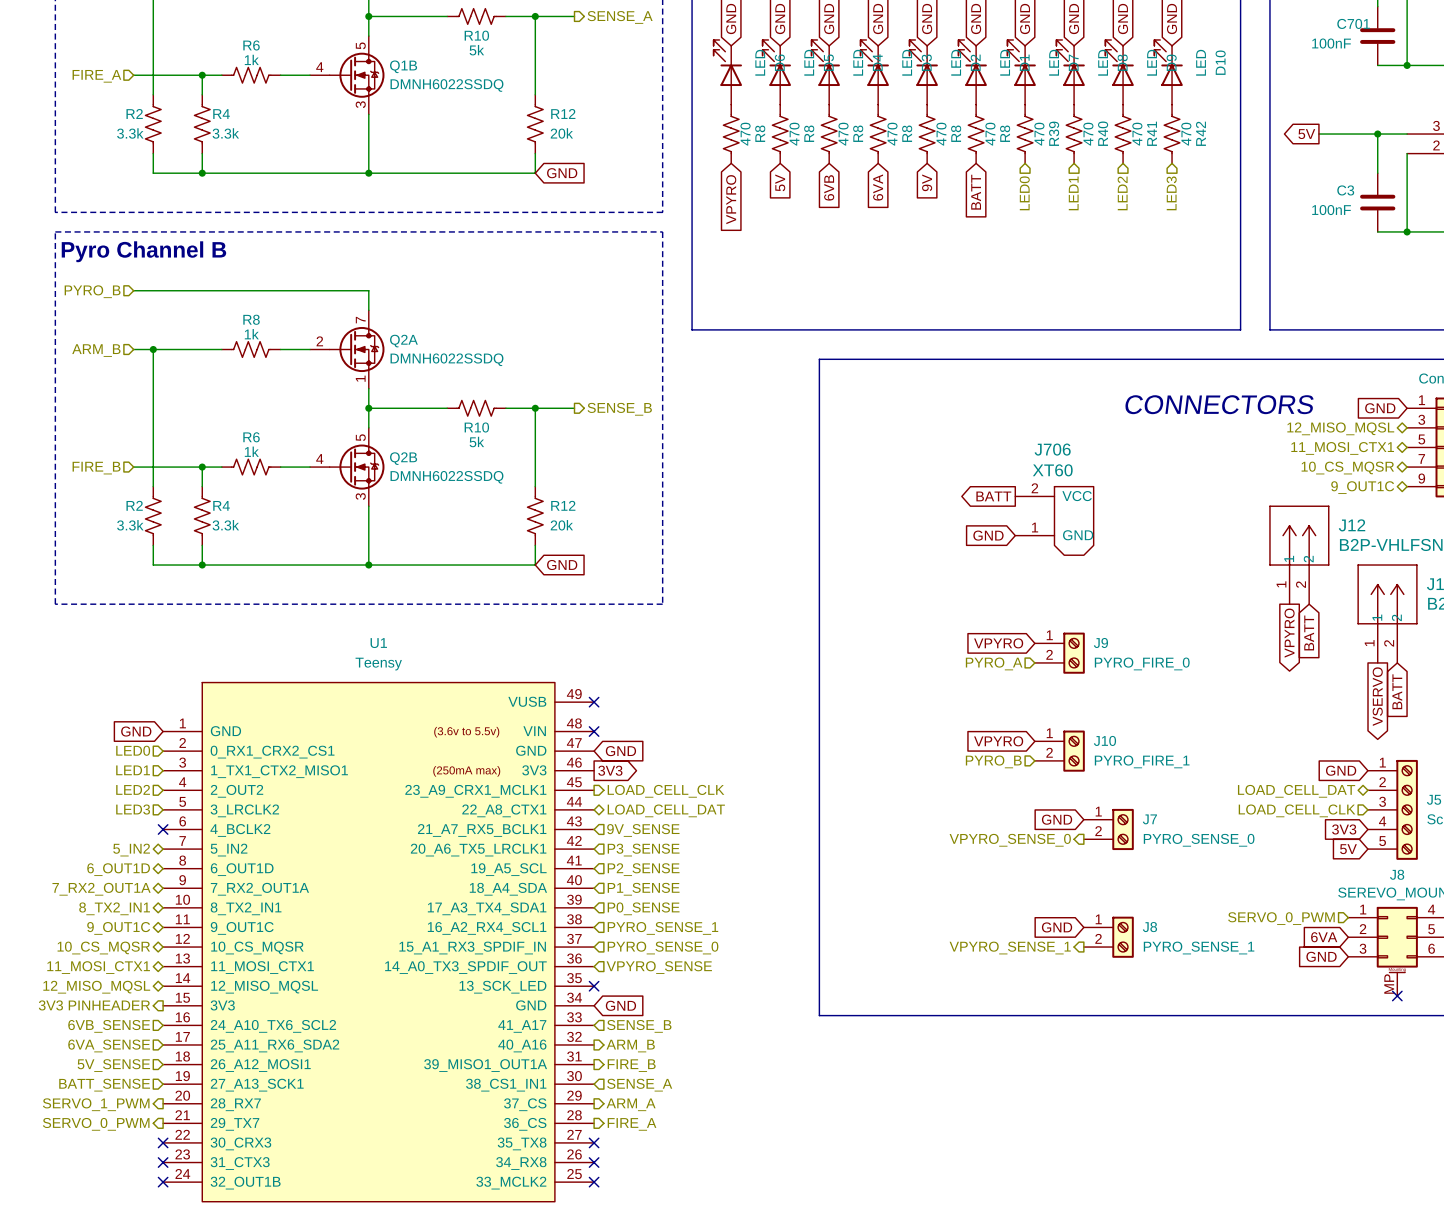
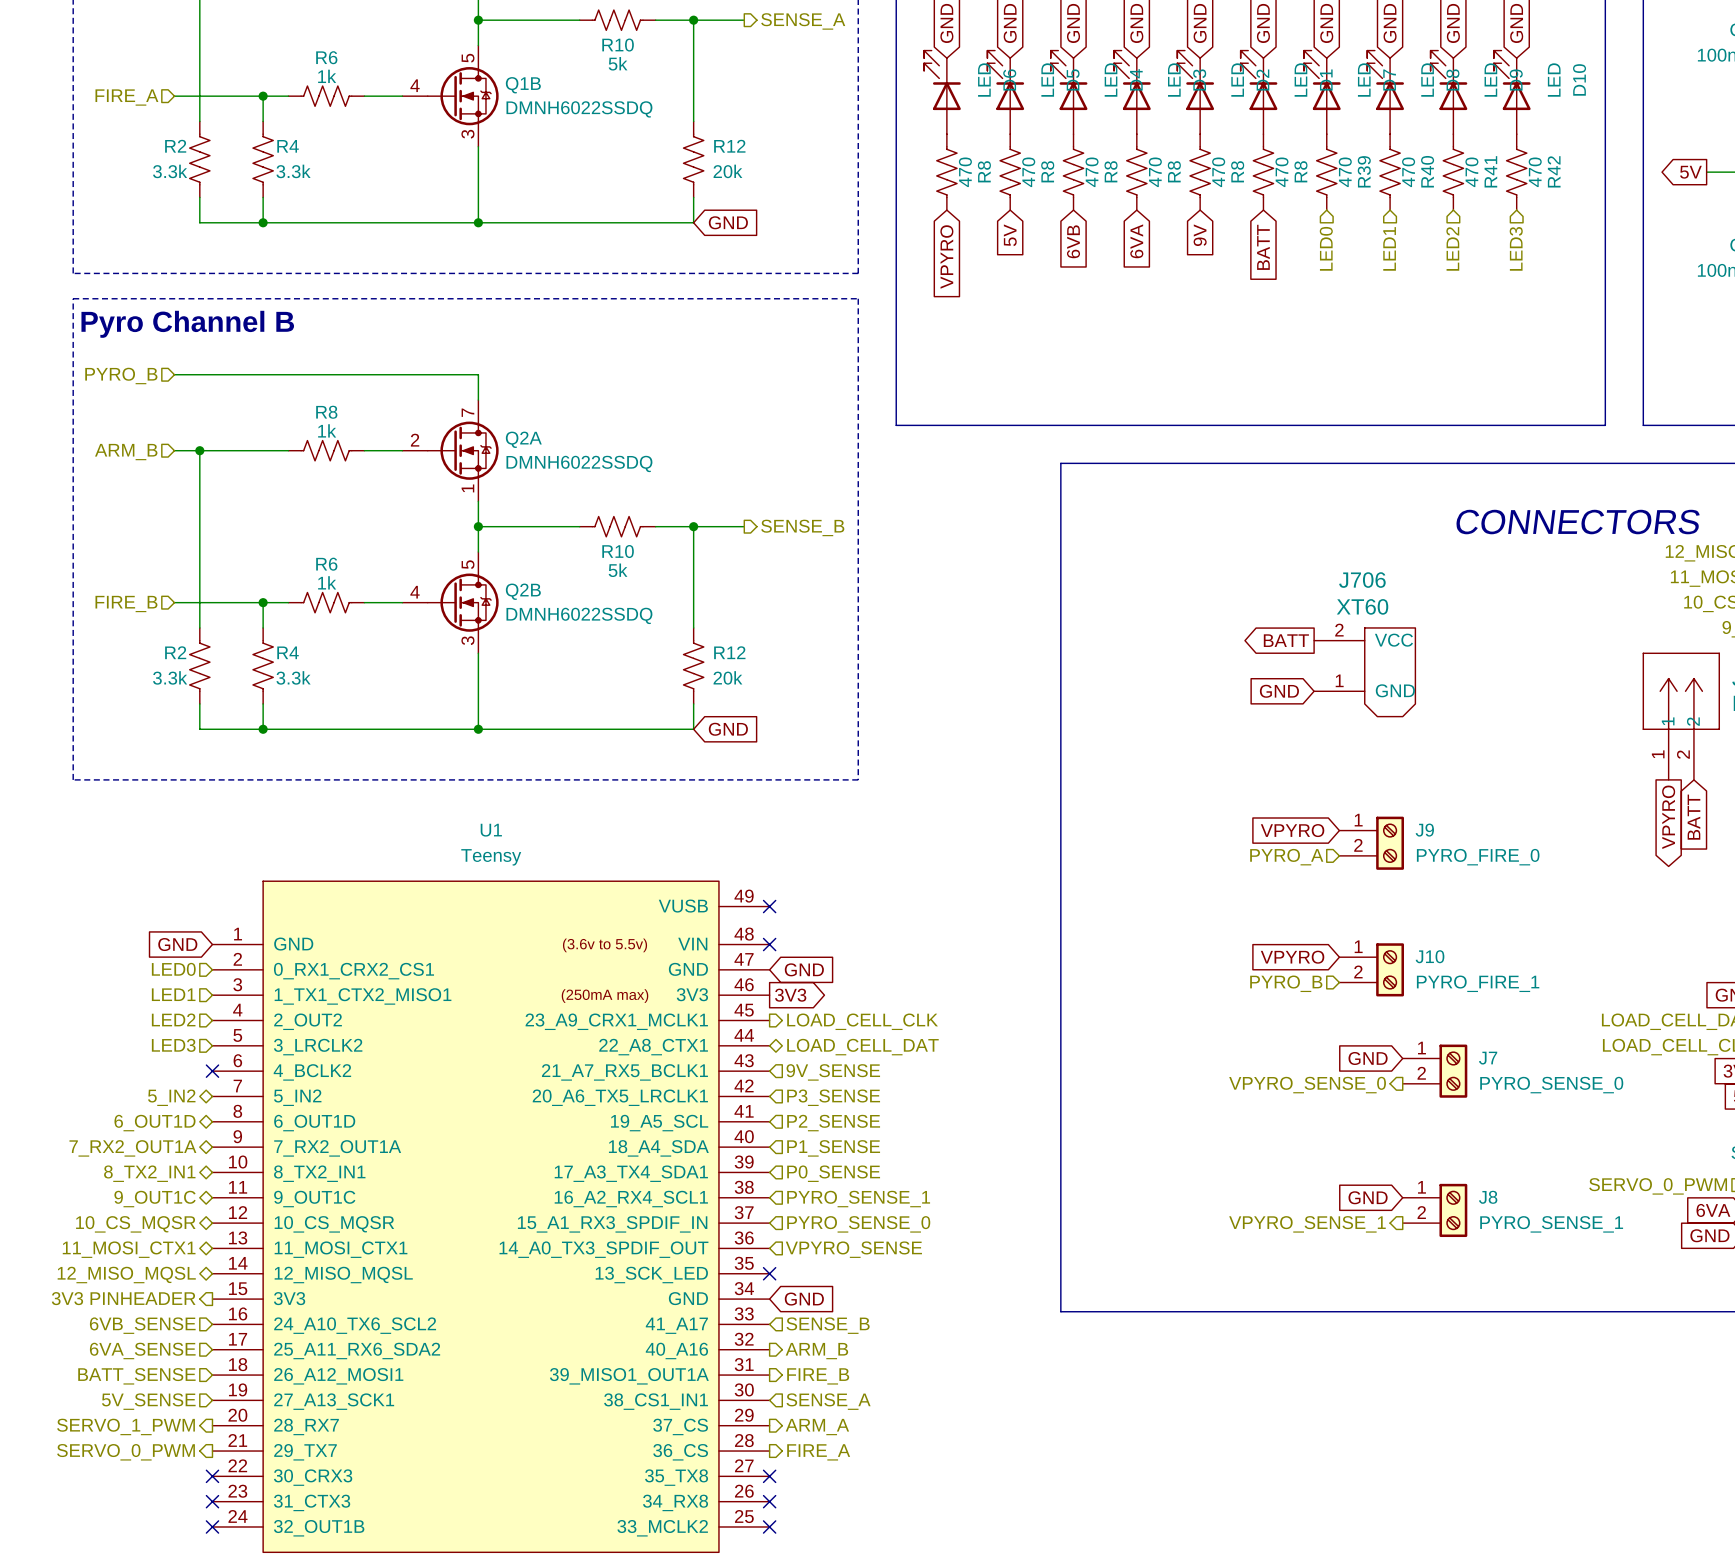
hierarchical label: 5V_SENSE (113, 1065) -> BATT_SENSE (136, 1376)
hierarchical label: BATT_SENSE (104, 1085) -> 5V_SENSE (148, 1401)

